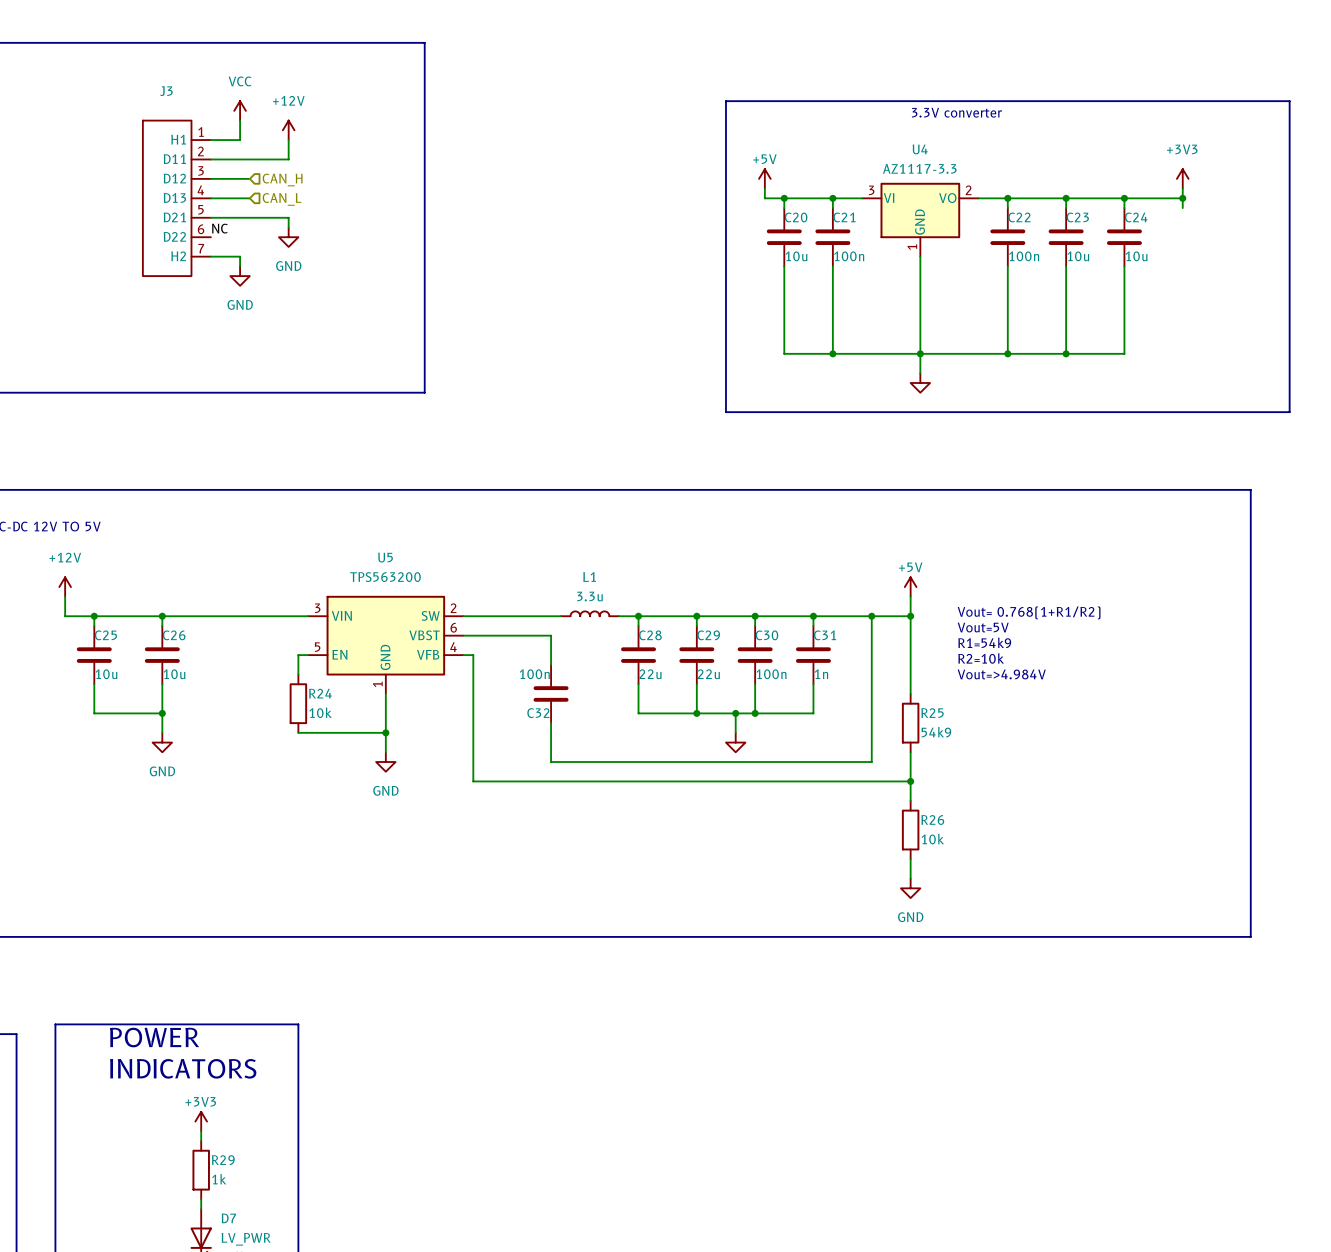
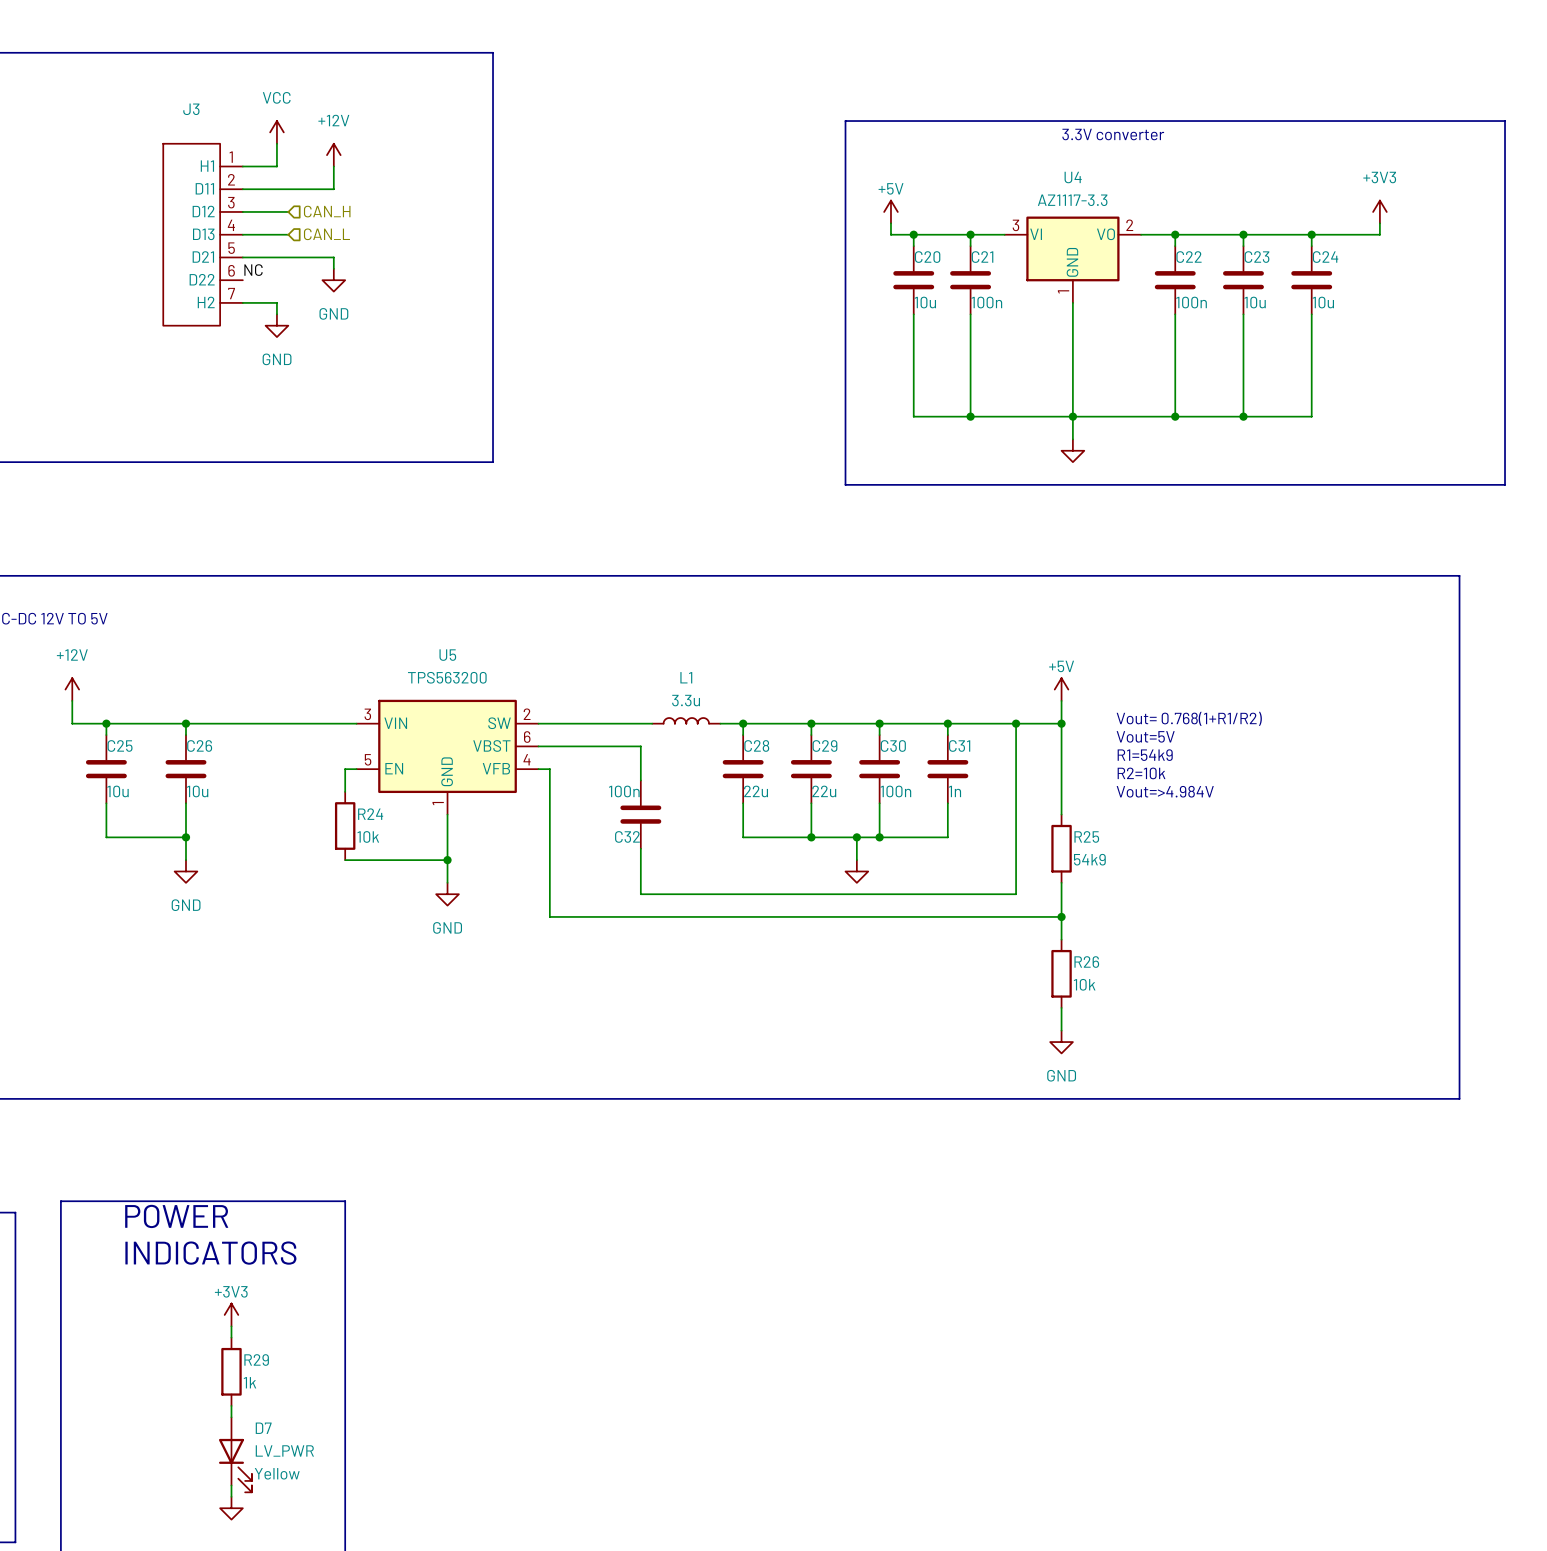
wire: (1182, 198) (1182, 208) -> none
junction: (1182, 198) -> none

